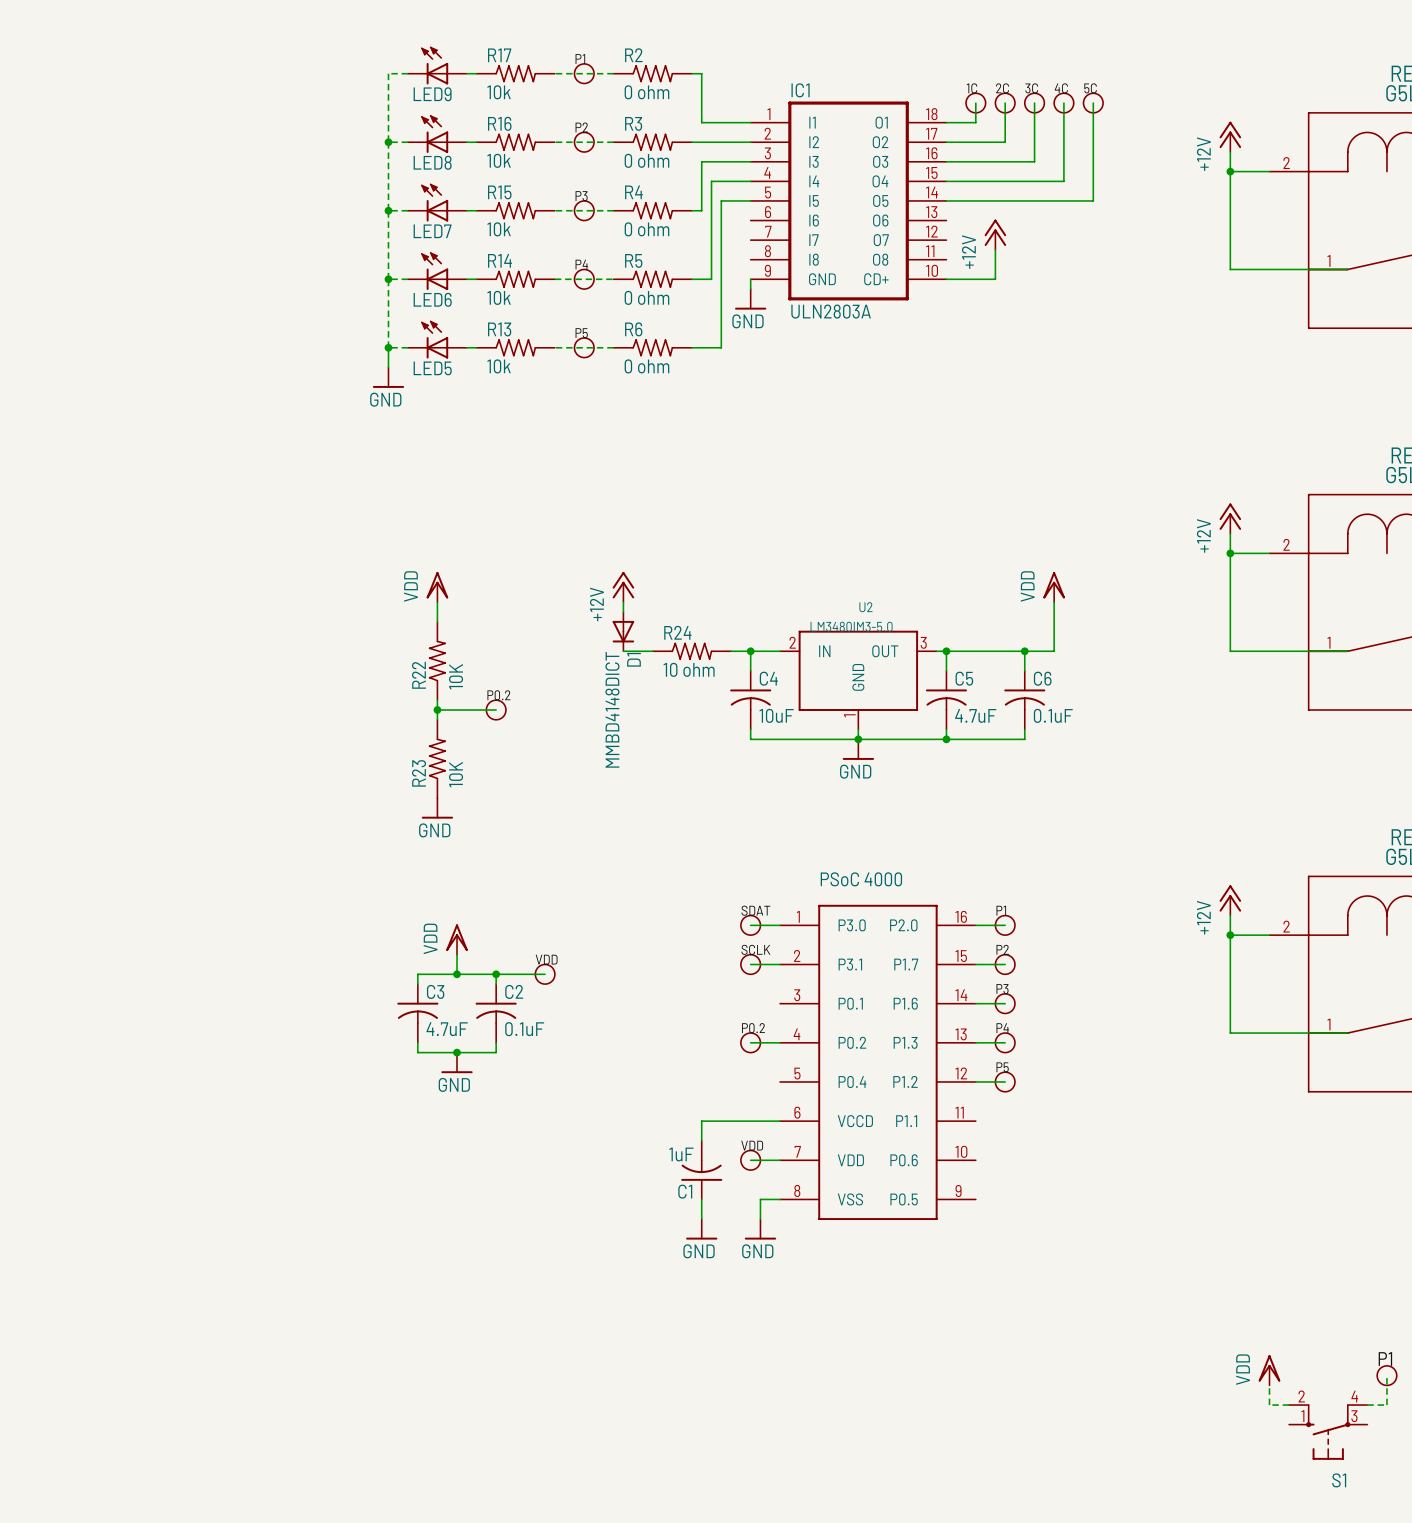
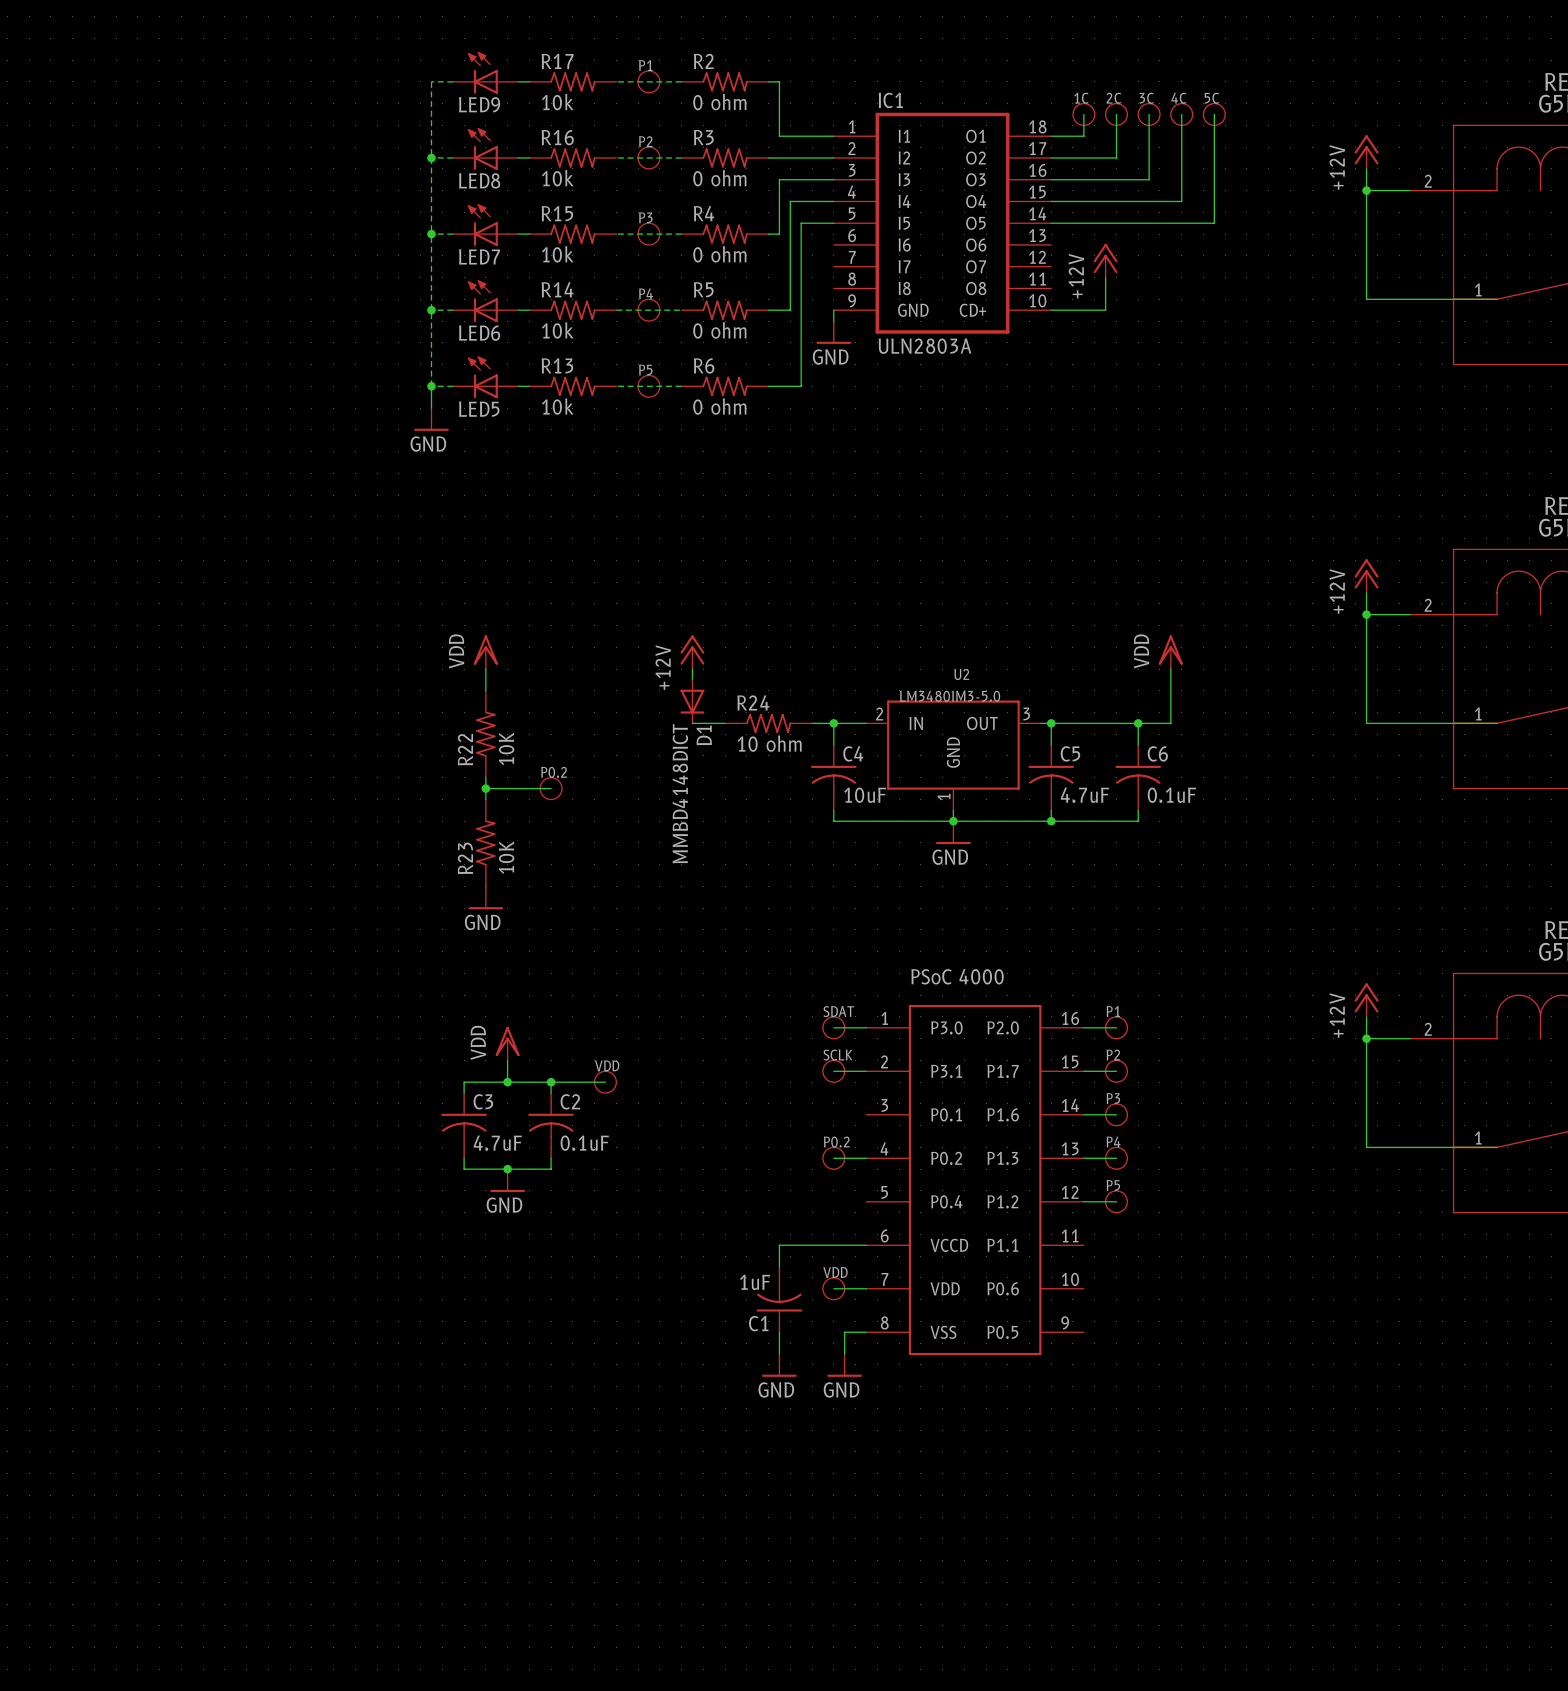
label: P1 (1385, 1359) -> none
drawing: [1376, 1365, 1398, 1387] -> none
power symbol: VDD (1269, 1370) -> none
wire: (1386, 1375) (1386, 1405) (1367, 1405) -> none
wire: (1269, 1385) (1269, 1405) (1289, 1405) -> none
S1: (1328, 1432) -> none

